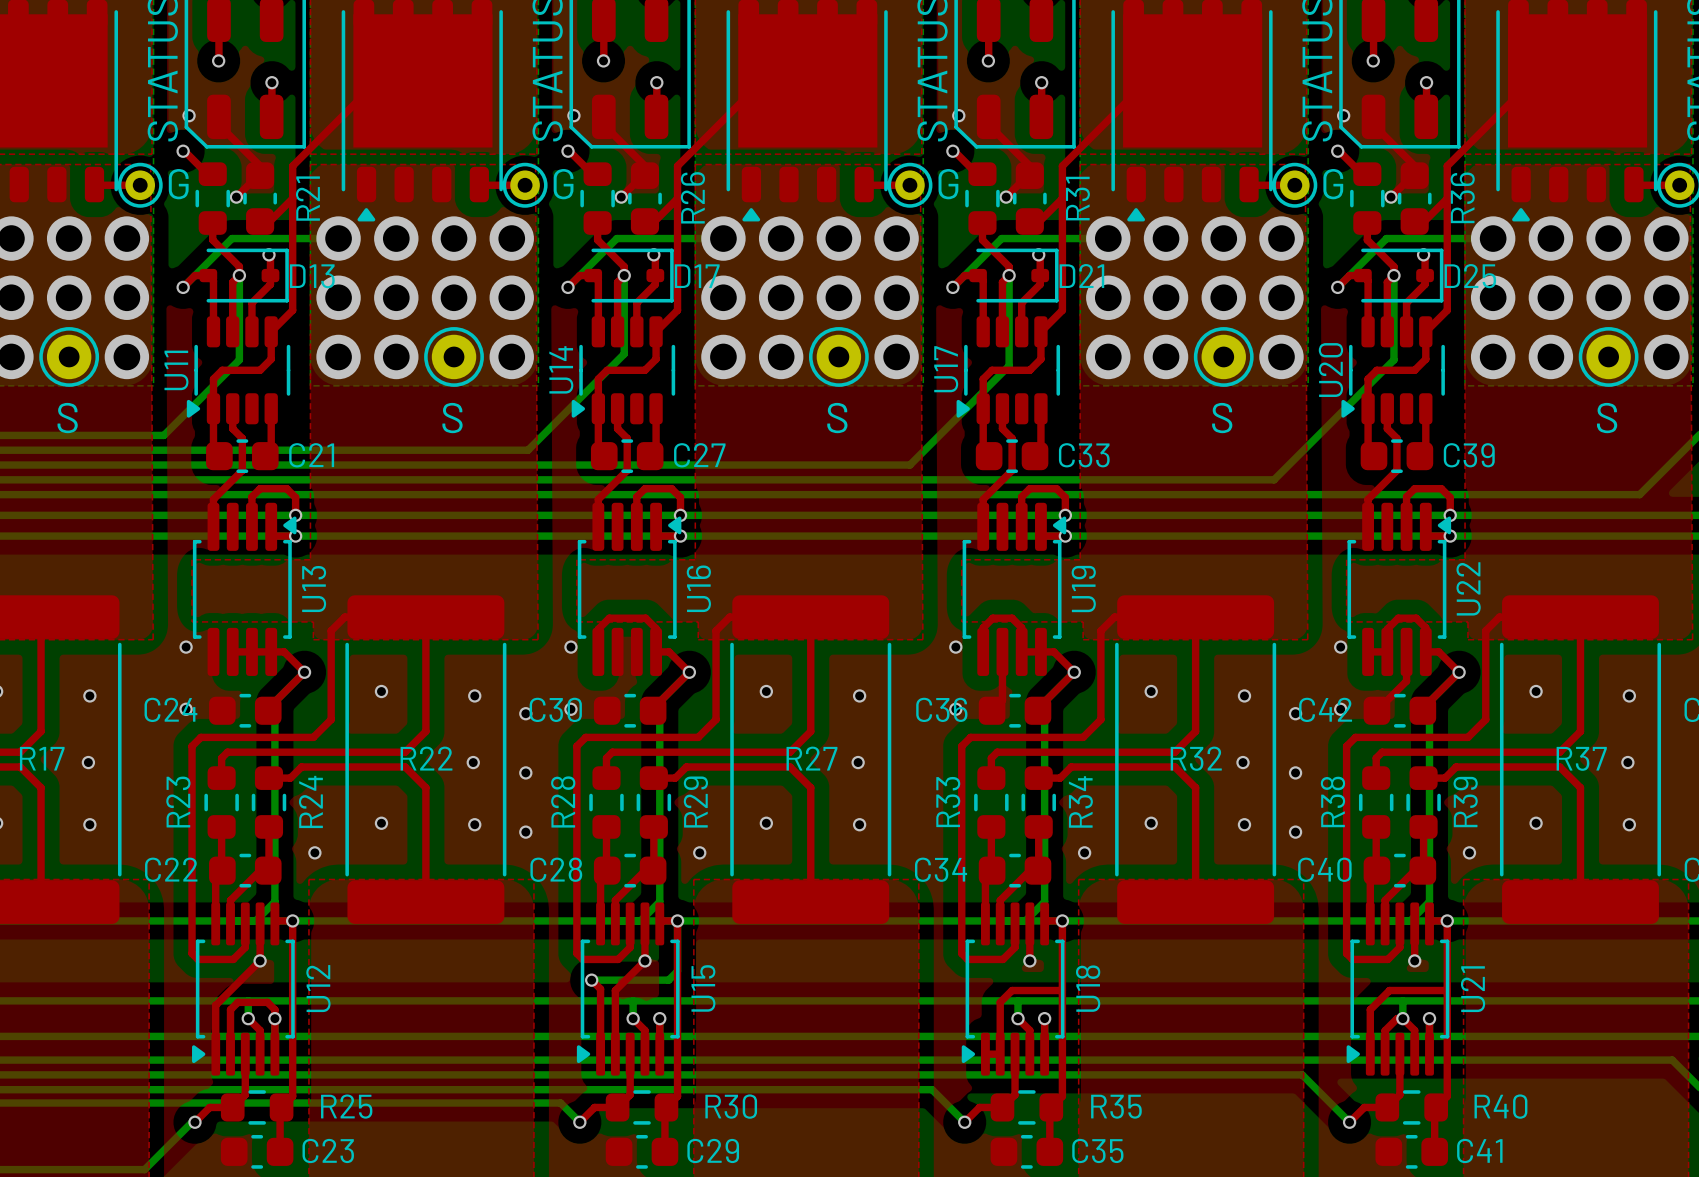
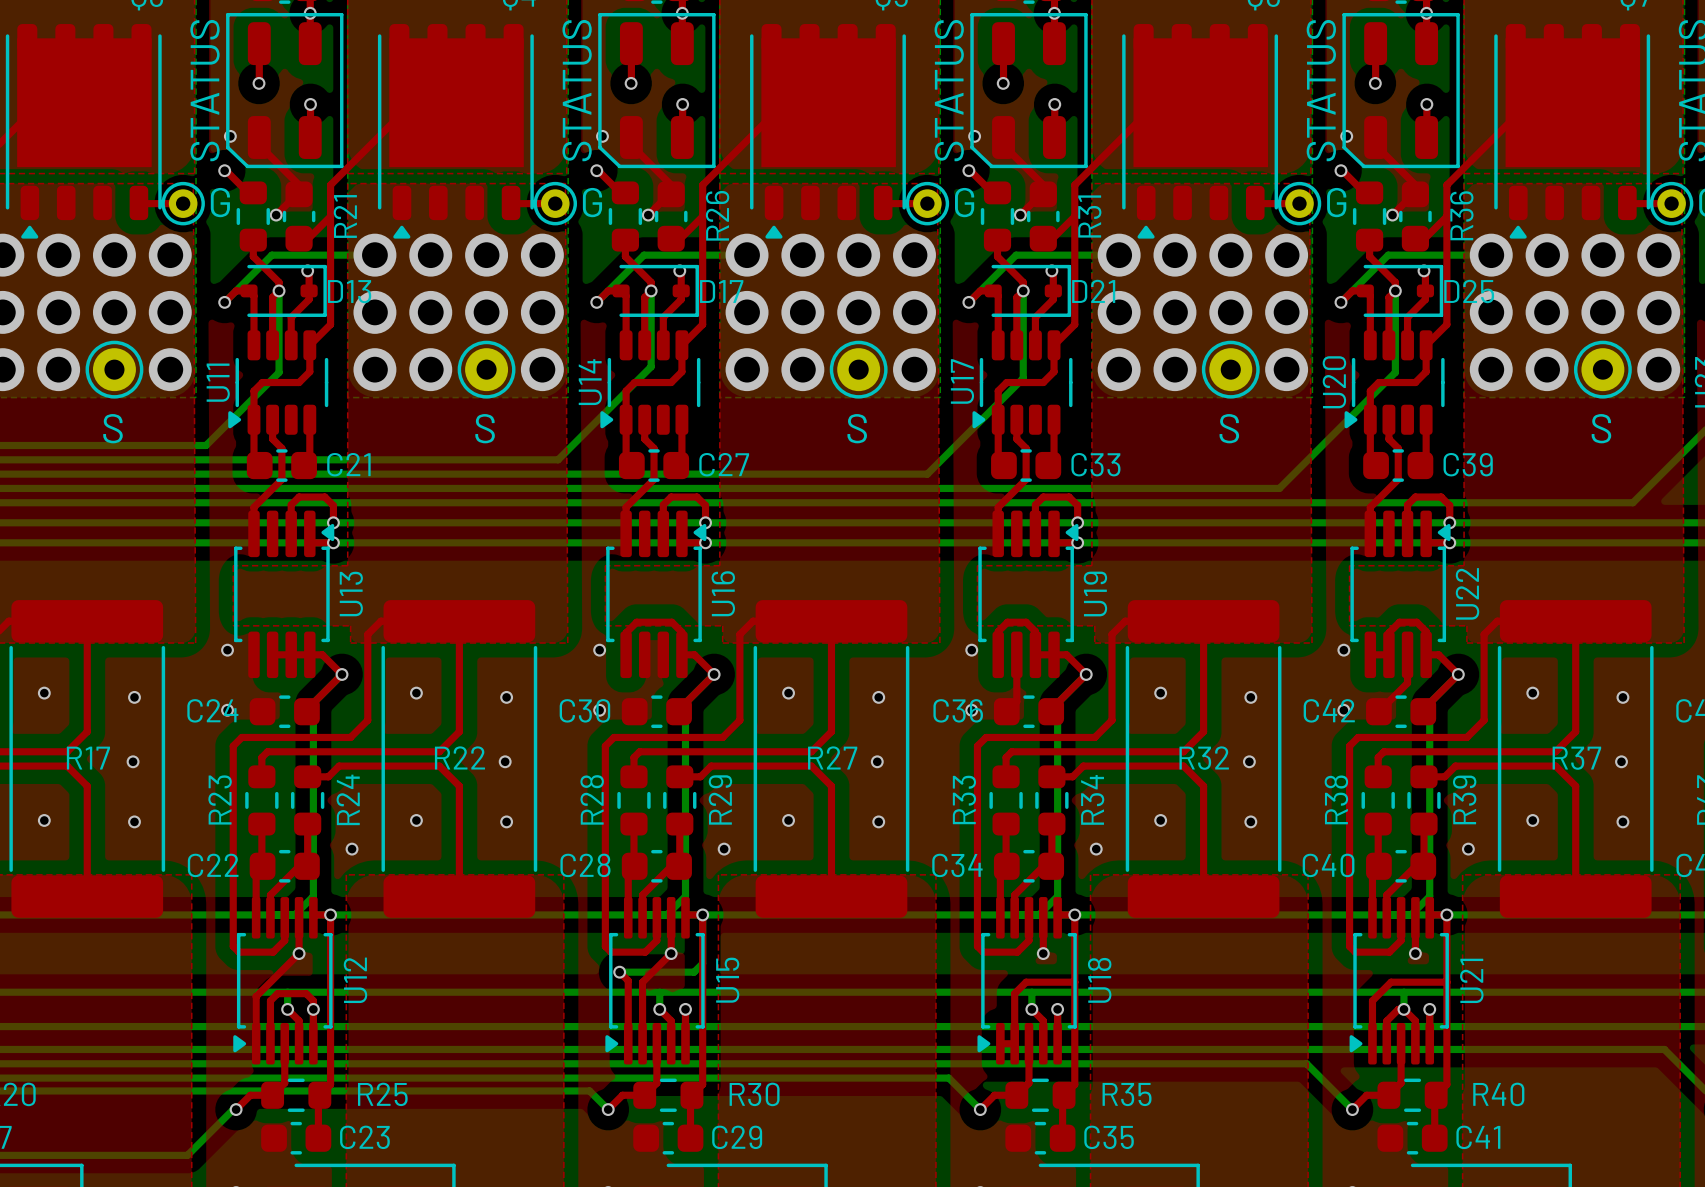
via: (525, 713) -> none
via: (1295, 713) -> none
via: (525, 772) -> none
via: (1295, 772) -> none
via: (525, 832) -> none
via: (1295, 832) -> none

